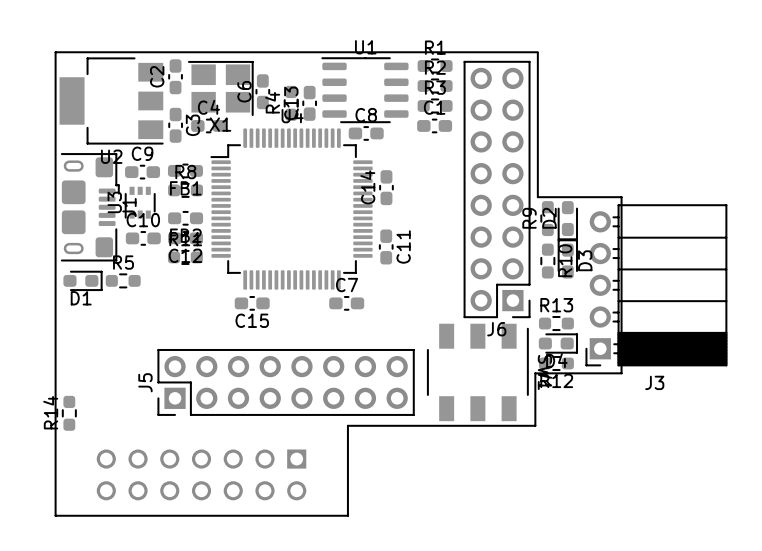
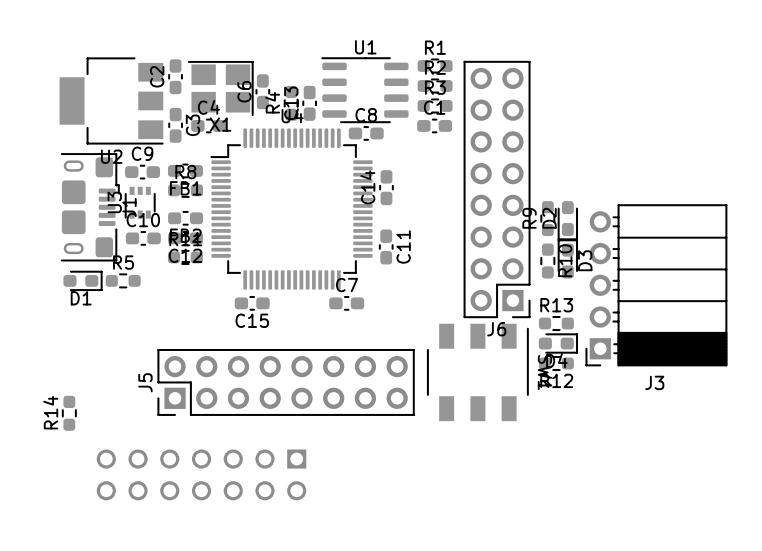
board edge: (537, 52) (55, 52) (55, 515) (347, 515) (347, 425) (535, 425) (535, 373) (621, 373) (621, 197) (537, 197) (537, 53) -> none

